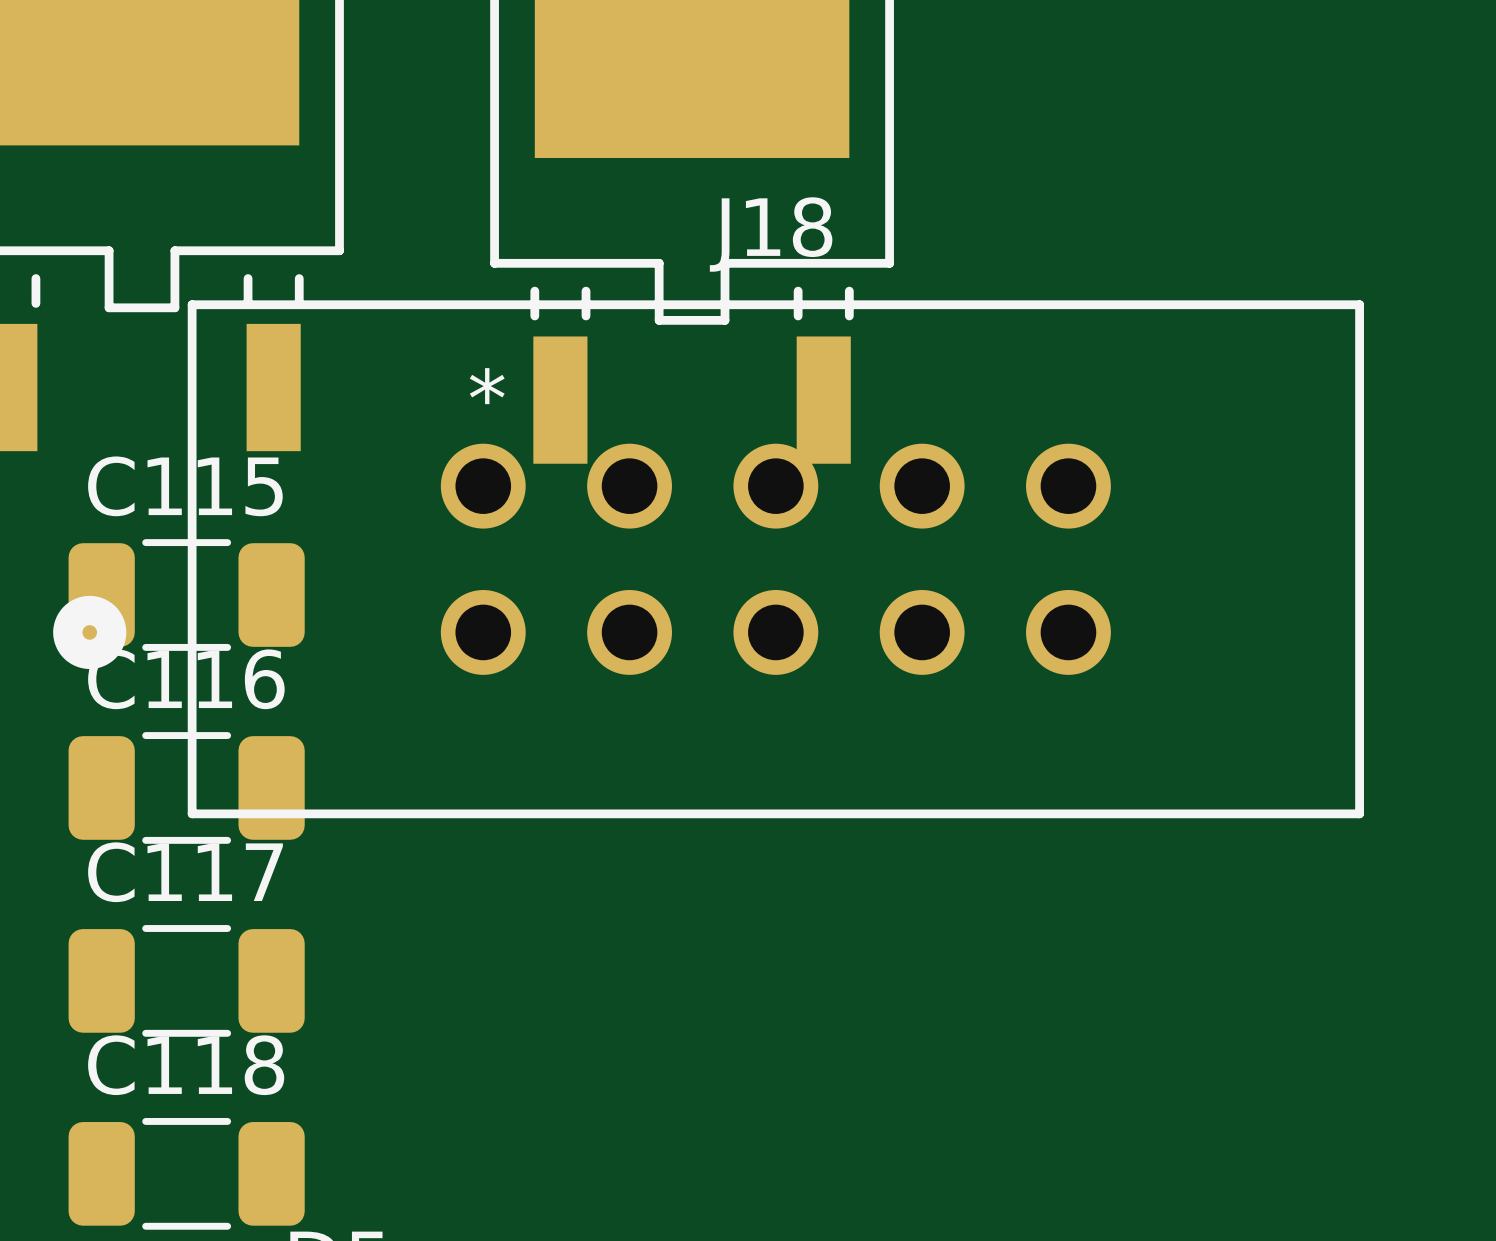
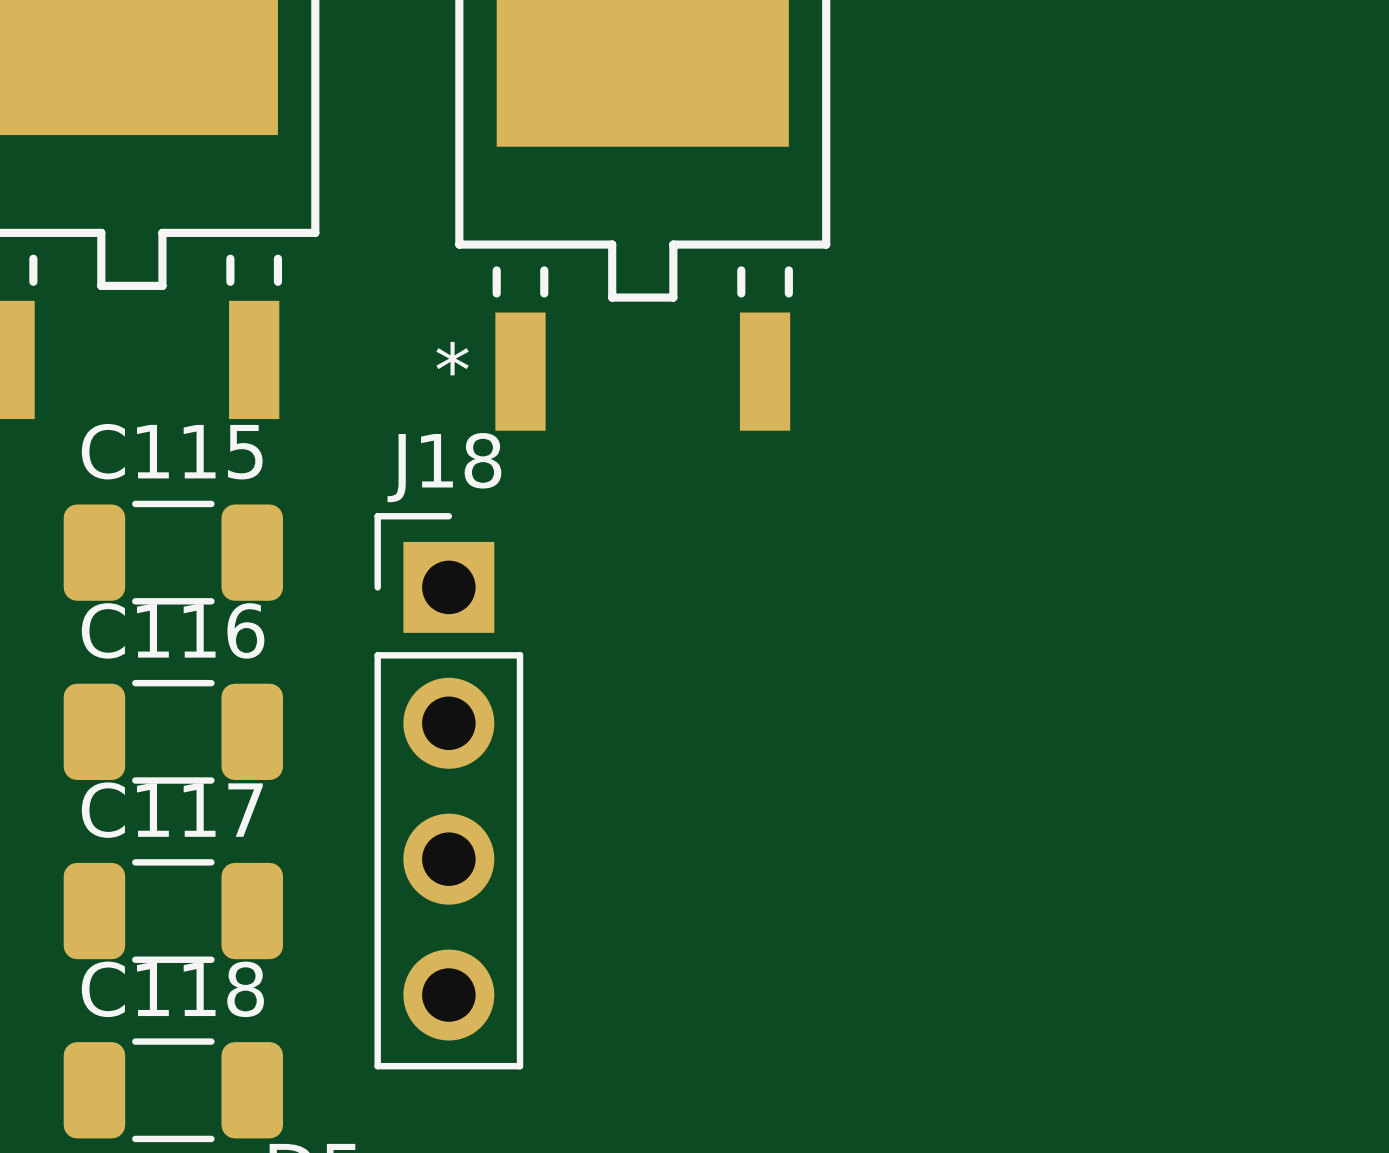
J18 footprint: [53, 300, 1364, 819] -> [374, 513, 524, 1070]

